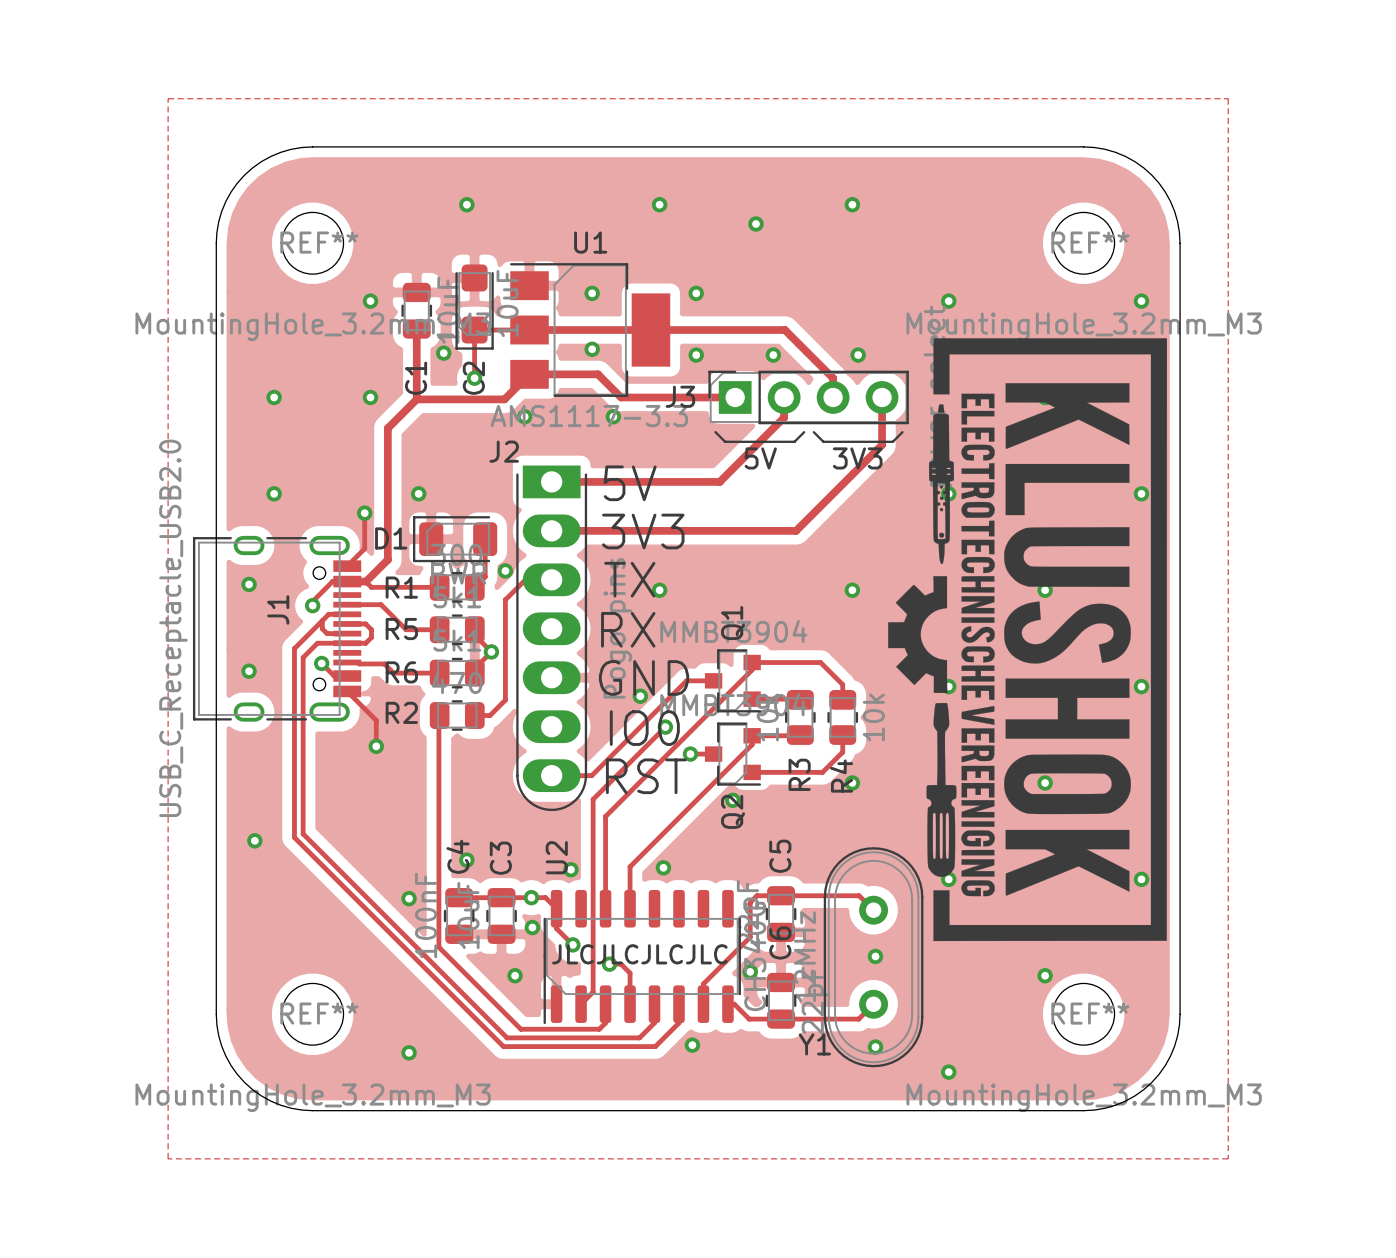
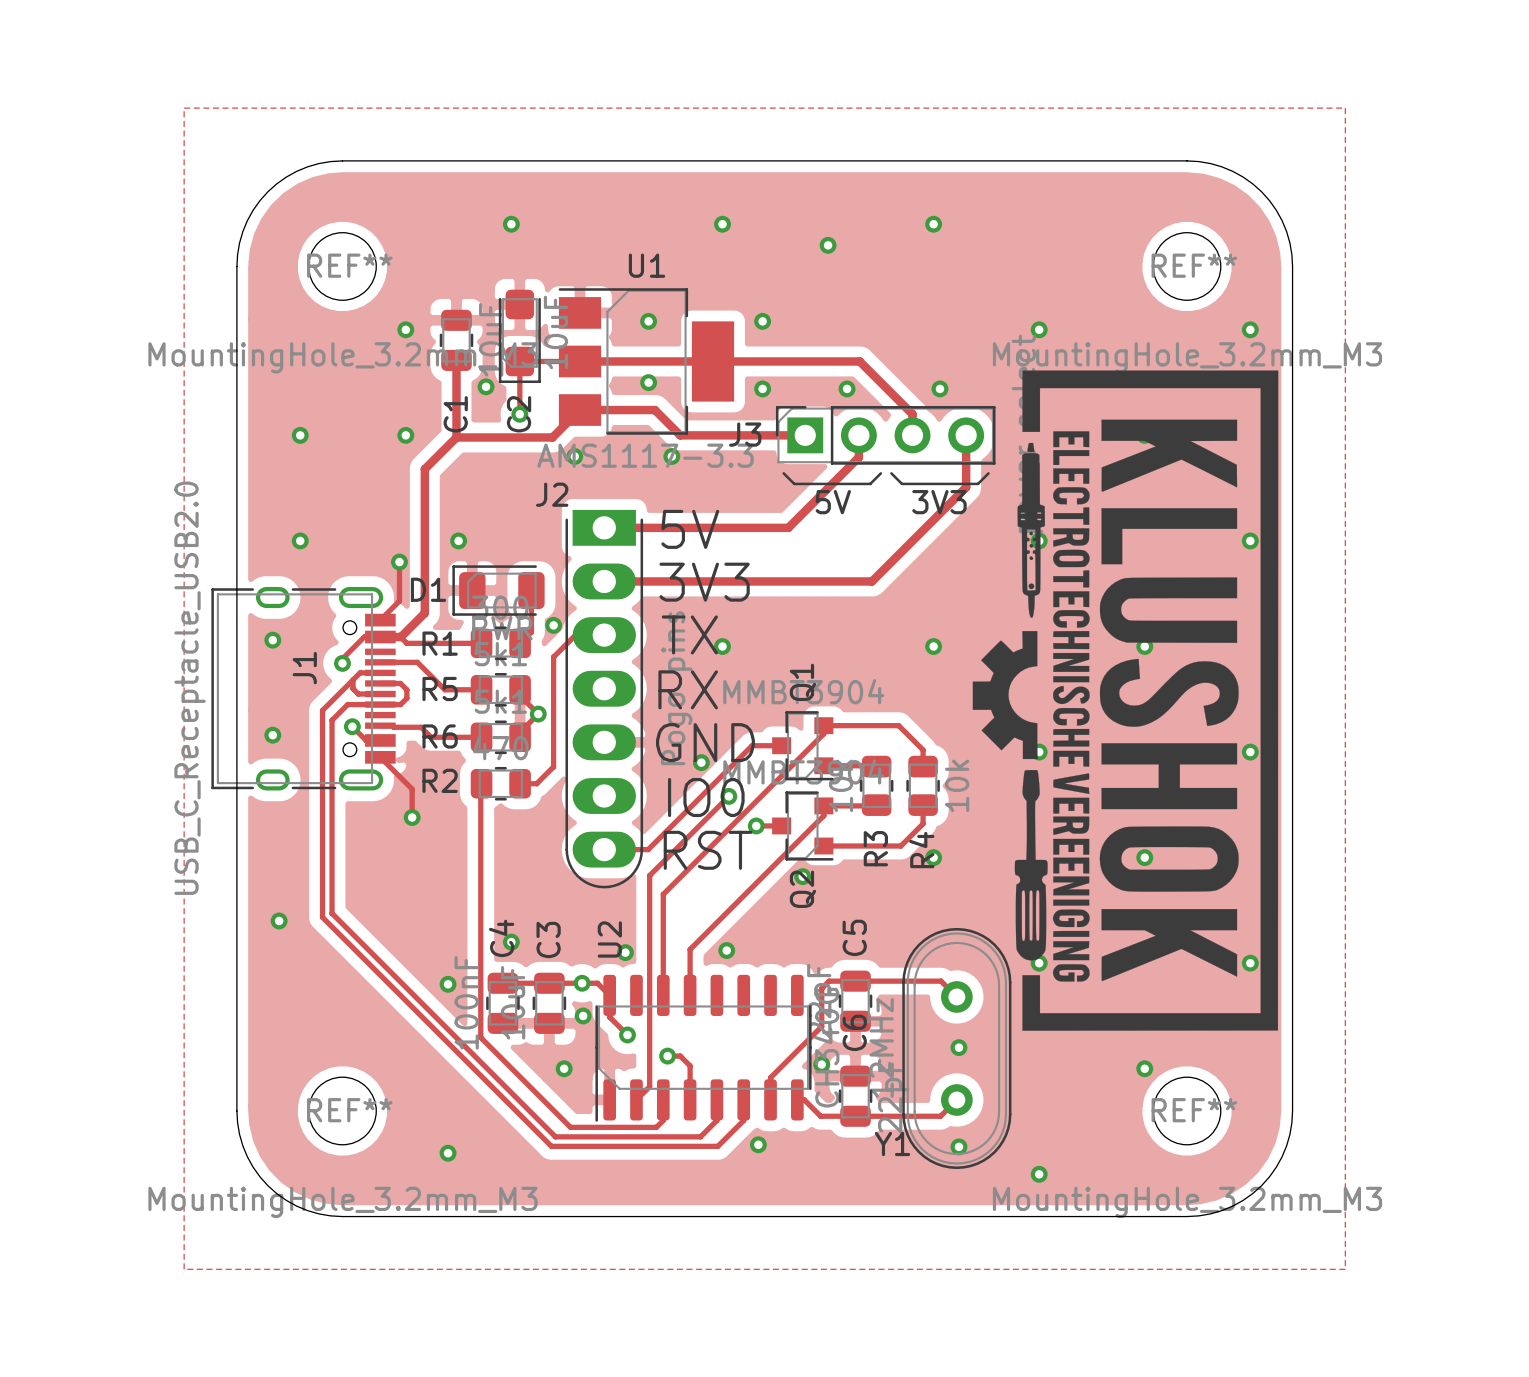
text: JLCJLCJLCJLC (639, 954) -> none

